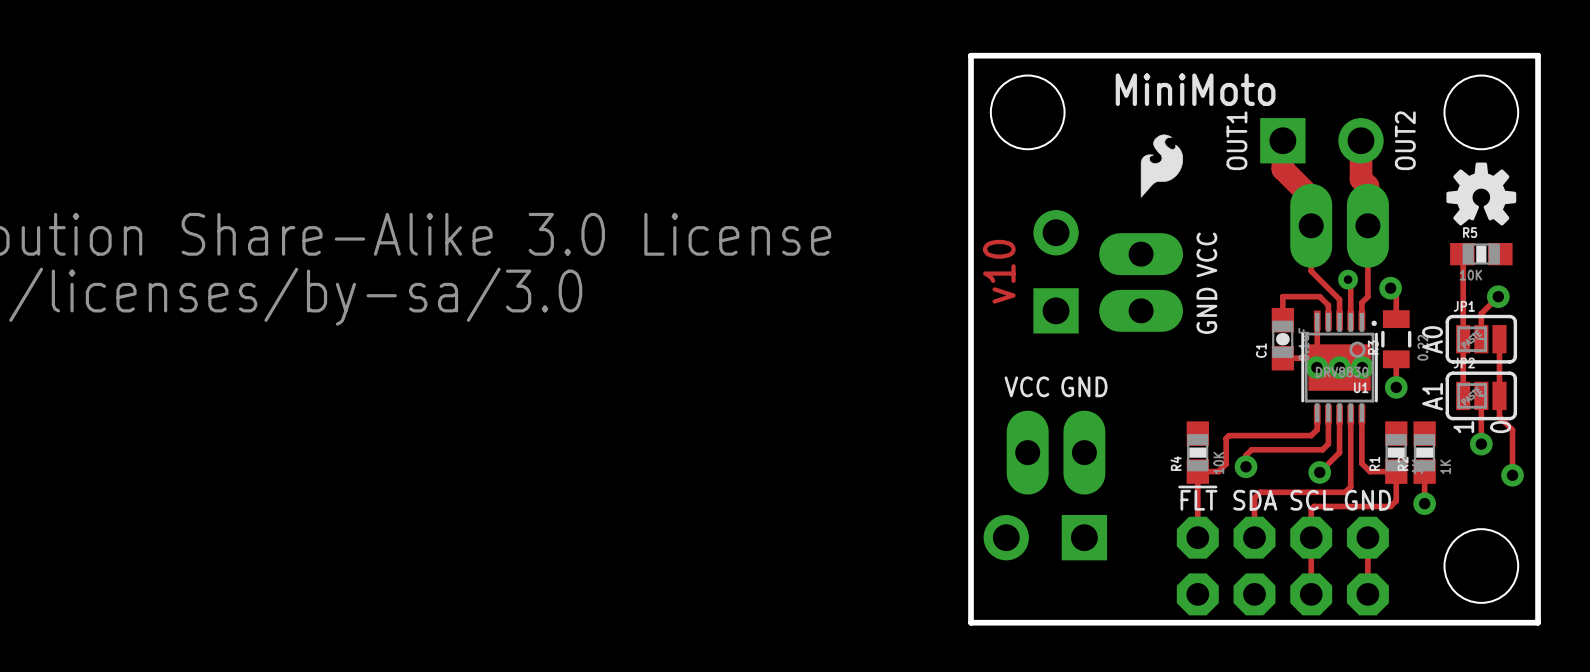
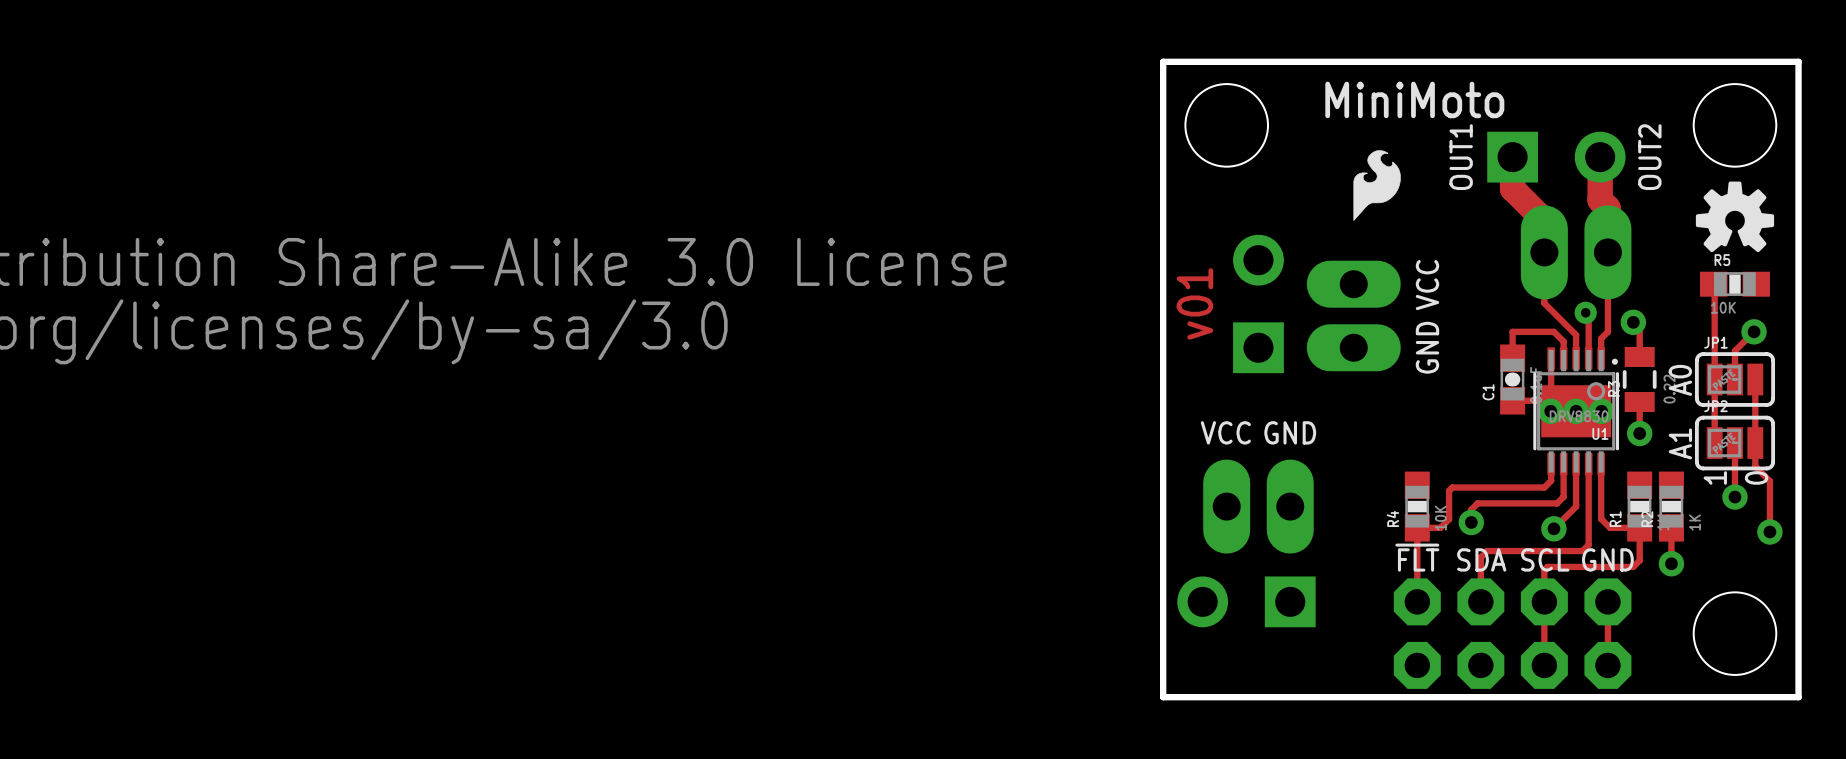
text: v10 (999, 271) -> v01 (1194, 303)

